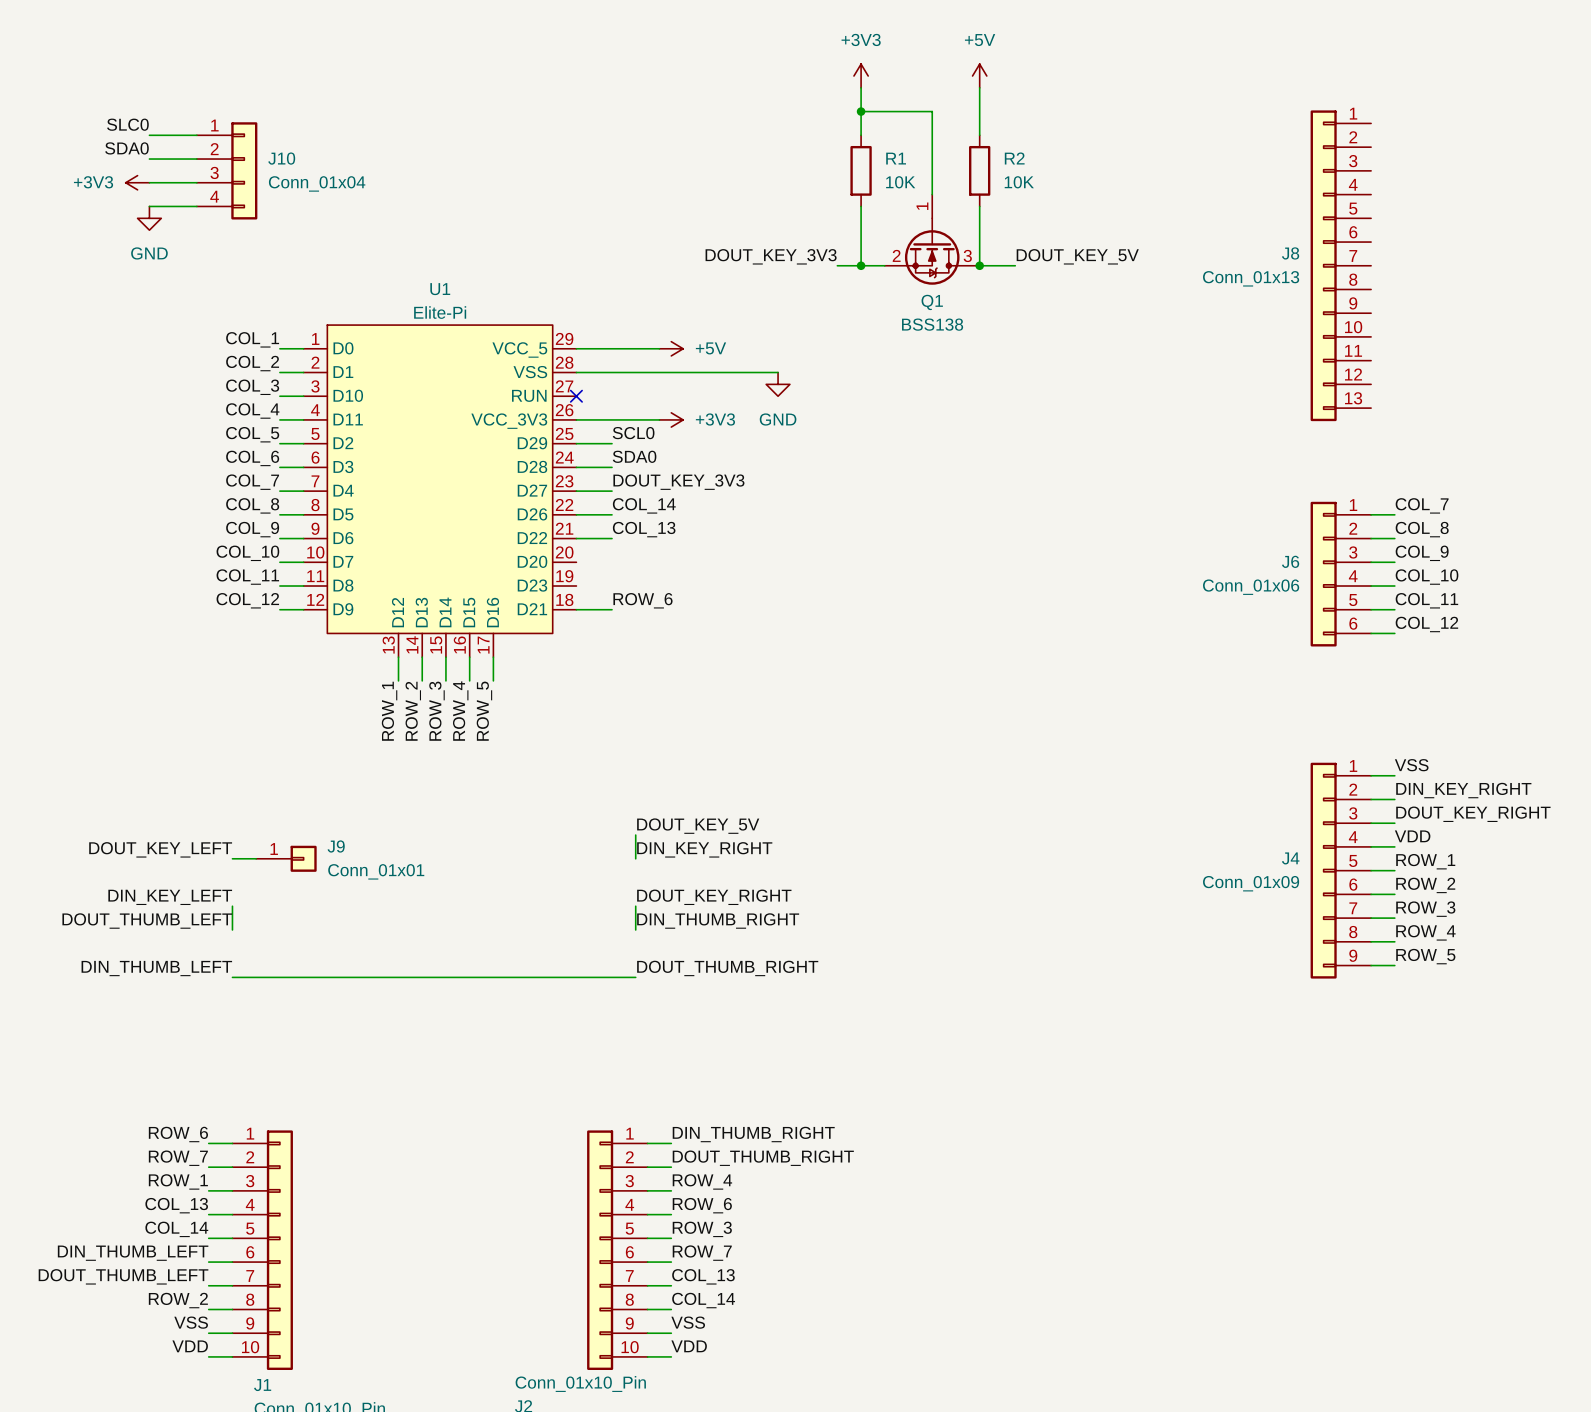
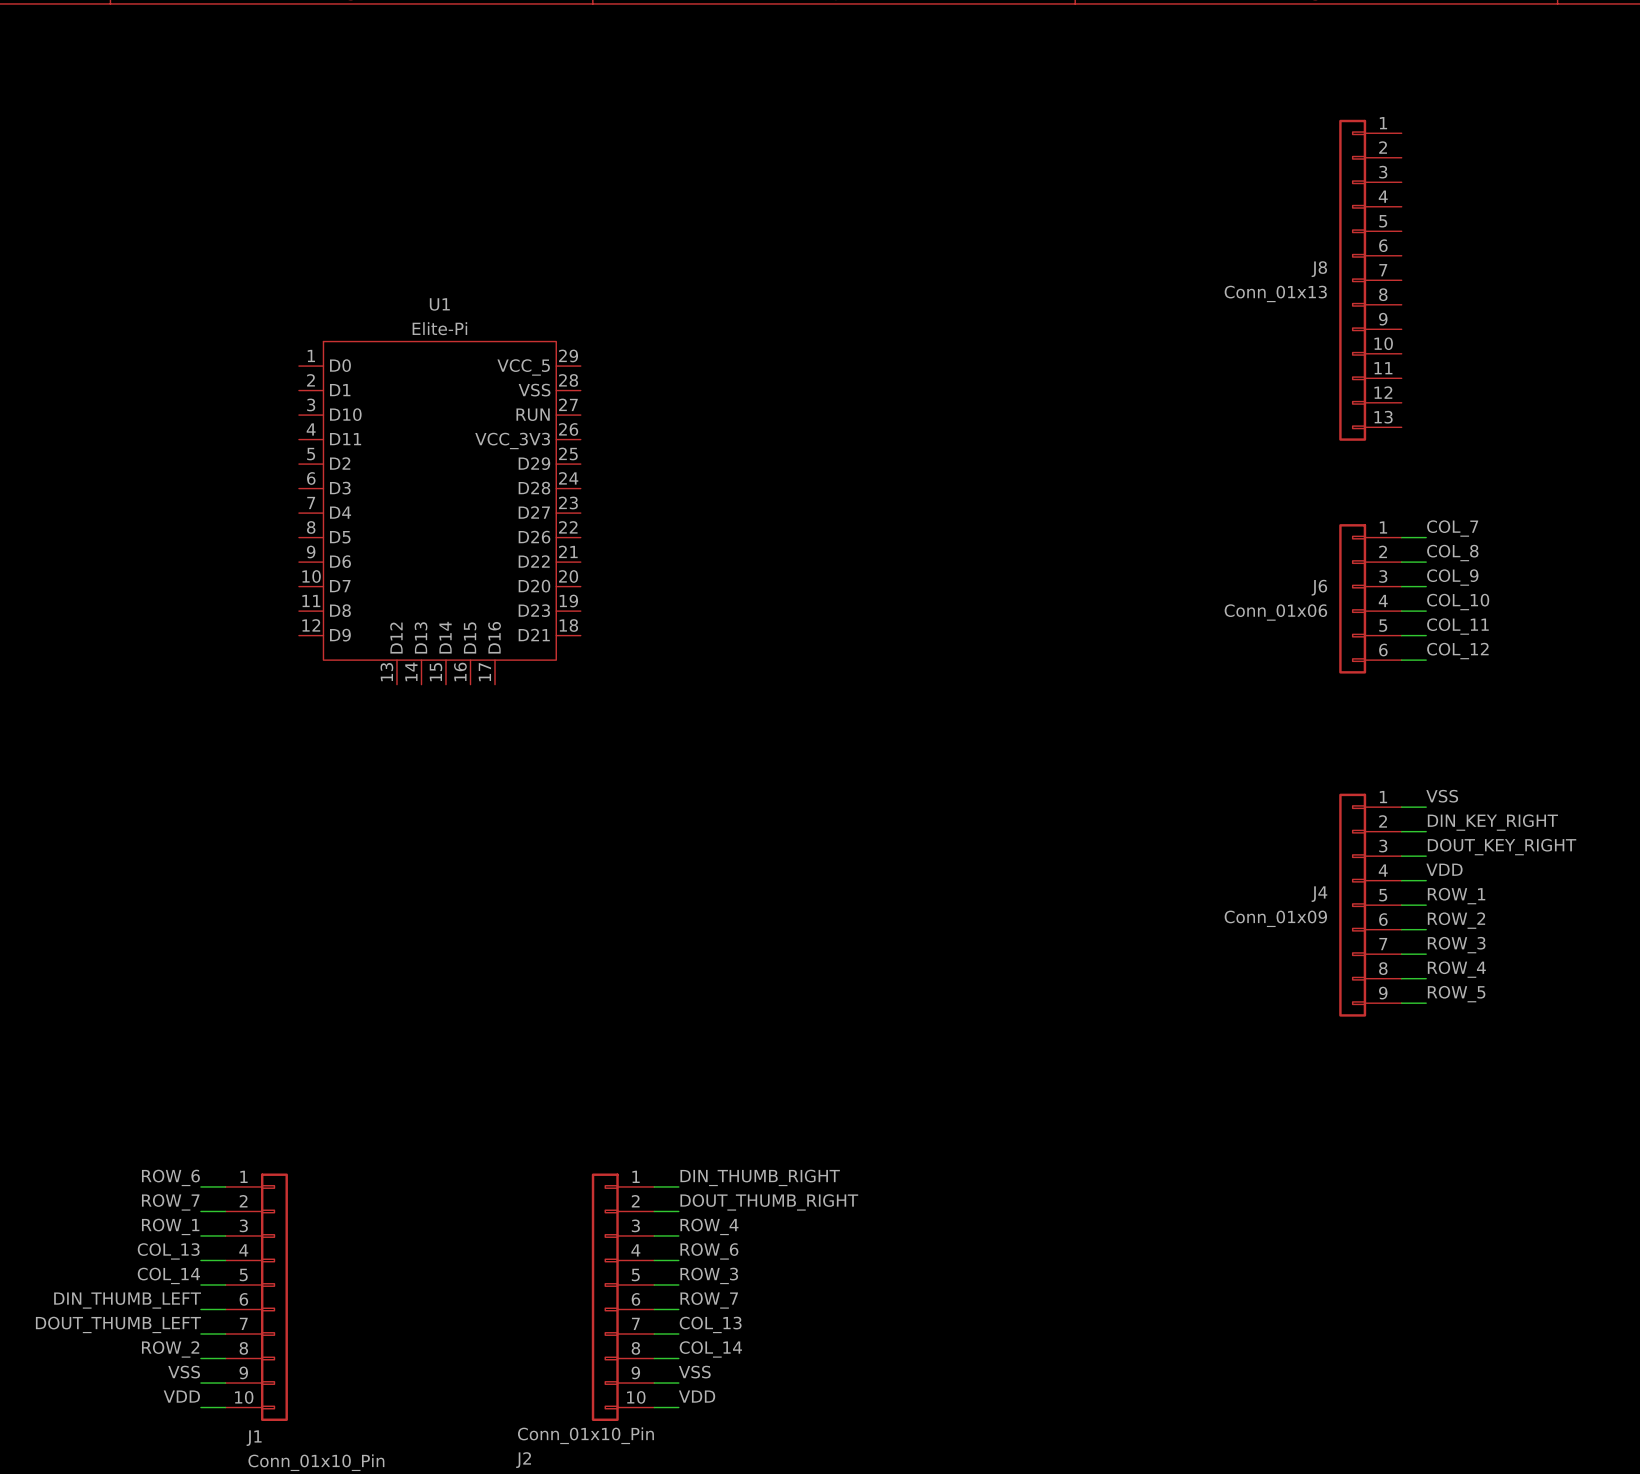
power symbol: +3V3 (861, 75) -> none
power symbol: +5V (979, 75) -> none
wire: (861, 87) (861, 135) -> none
wire: (979, 87) (979, 135) -> none
wire: (861, 111) (932, 111) (932, 194) -> none
junction: (861, 111) -> none
label: SLC0 (127, 124) -> none
wire: (149, 135) (196, 135) -> none
label: SDA0 (126, 148) -> none
wire: (149, 159) (196, 159) -> none
J10: Conn_01x04 (227, 170) -> none
R1: 10K (861, 170) -> none
R2: 10K (979, 170) -> none
power symbol: +3V3 (137, 182) -> none
wire: (149, 182) (196, 182) -> none
wire: (149, 206) (196, 206) -> none
wire: (861, 206) (861, 265) -> none
wire: (979, 206) (979, 265) (1015, 265) -> none
power symbol: GND (149, 218) -> none
Q1: BSS138 (932, 239) -> none
label: DOUT_KEY_3V3 (771, 256) -> none
label: DOUT_KEY_5V (1077, 256) -> none
wire: (837, 265) (884, 265) -> none
junction: (861, 265) -> none
junction: (979, 265) -> none
label: COL_1 (252, 339) -> none
wire: (279, 348) (303, 348) -> none
wire: (576, 348) (659, 348) -> none
power symbol: +5V (671, 348) -> none
label: COL_2 (252, 363) -> none
wire: (279, 372) (303, 372) -> none
wire: (576, 372) (778, 372) -> none
power symbol: GND (778, 384) -> none
label: COL_3 (252, 387) -> none
wire: (279, 396) (303, 396) -> none
no-connect mark: (576, 396) -> none
label: COL_4 (252, 410) -> none
wire: (279, 419) (303, 419) -> none
wire: (576, 419) (659, 419) -> none
power symbol: +3V3 (671, 419) -> none
label: SCL0 (633, 433) -> none
label: COL_5 (252, 434) -> none
wire: (279, 443) (303, 443) -> none
wire: (576, 443) (612, 443) -> none
label: SDA0 (634, 456) -> none
label: COL_6 (252, 458) -> none
wire: (279, 467) (303, 467) -> none
wire: (576, 467) (612, 467) -> none
label: COL_7 (252, 482) -> none
label: DOUT_KEY_3V3 (678, 482) -> none
wire: (279, 491) (303, 491) -> none
wire: (576, 491) (612, 491) -> none
label: COL_8 (252, 505) -> none
label: COL_14 (644, 505) -> none
wire: (279, 514) (303, 514) -> none
wire: (576, 514) (612, 514) -> none
label: COL_9 (252, 529) -> none
label: COL_13 (644, 529) -> none
wire: (279, 538) (303, 538) -> none
wire: (576, 538) (612, 538) -> none
label: COL_10 (247, 553) -> none
wire: (279, 562) (303, 562) -> none
label: COL_11 (247, 577) -> none
wire: (279, 586) (303, 586) -> none
label: COL_12 (247, 600) -> none
label: ROW_6 (642, 600) -> none
wire: (279, 609) (303, 609) -> none
wire: (576, 609) (612, 609) -> none
wire: (398, 657) (398, 680) -> none
wire: (422, 657) (422, 680) -> none
wire: (445, 657) (445, 680) -> none
wire: (469, 657) (469, 680) -> none
wire: (493, 657) (493, 680) -> none
label: ROW_1 (389, 711) -> none
label: ROW_2 (413, 711) -> none
label: ROW_3 (436, 711) -> none
label: ROW_4 (460, 711) -> none
label: ROW_5 (484, 711) -> none
label: DOUT_KEY_5V (698, 826) -> none
wire: (635, 835) (635, 858) -> none
label: DOUT_KEY_LEFT (160, 849) -> none
label: DIN_KEY_RIGHT (704, 849) -> none
wire: (232, 858) (256, 858) -> none
J9: Conn_01x01 (286, 858) -> none
label: DIN_KEY_LEFT (170, 897) -> none
label: DOUT_KEY_RIGHT (714, 897) -> none
wire: (232, 906) (232, 929) -> none
wire: (635, 906) (635, 929) -> none
label: DOUT_THUMB_LEFT (147, 921) -> none
label: DIN_THUMB_RIGHT (718, 921) -> none
label: DIN_THUMB_LEFT (156, 968) -> none
label: DOUT_THUMB_RIGHT (727, 968) -> none
wire: (232, 977) (635, 977) -> none

